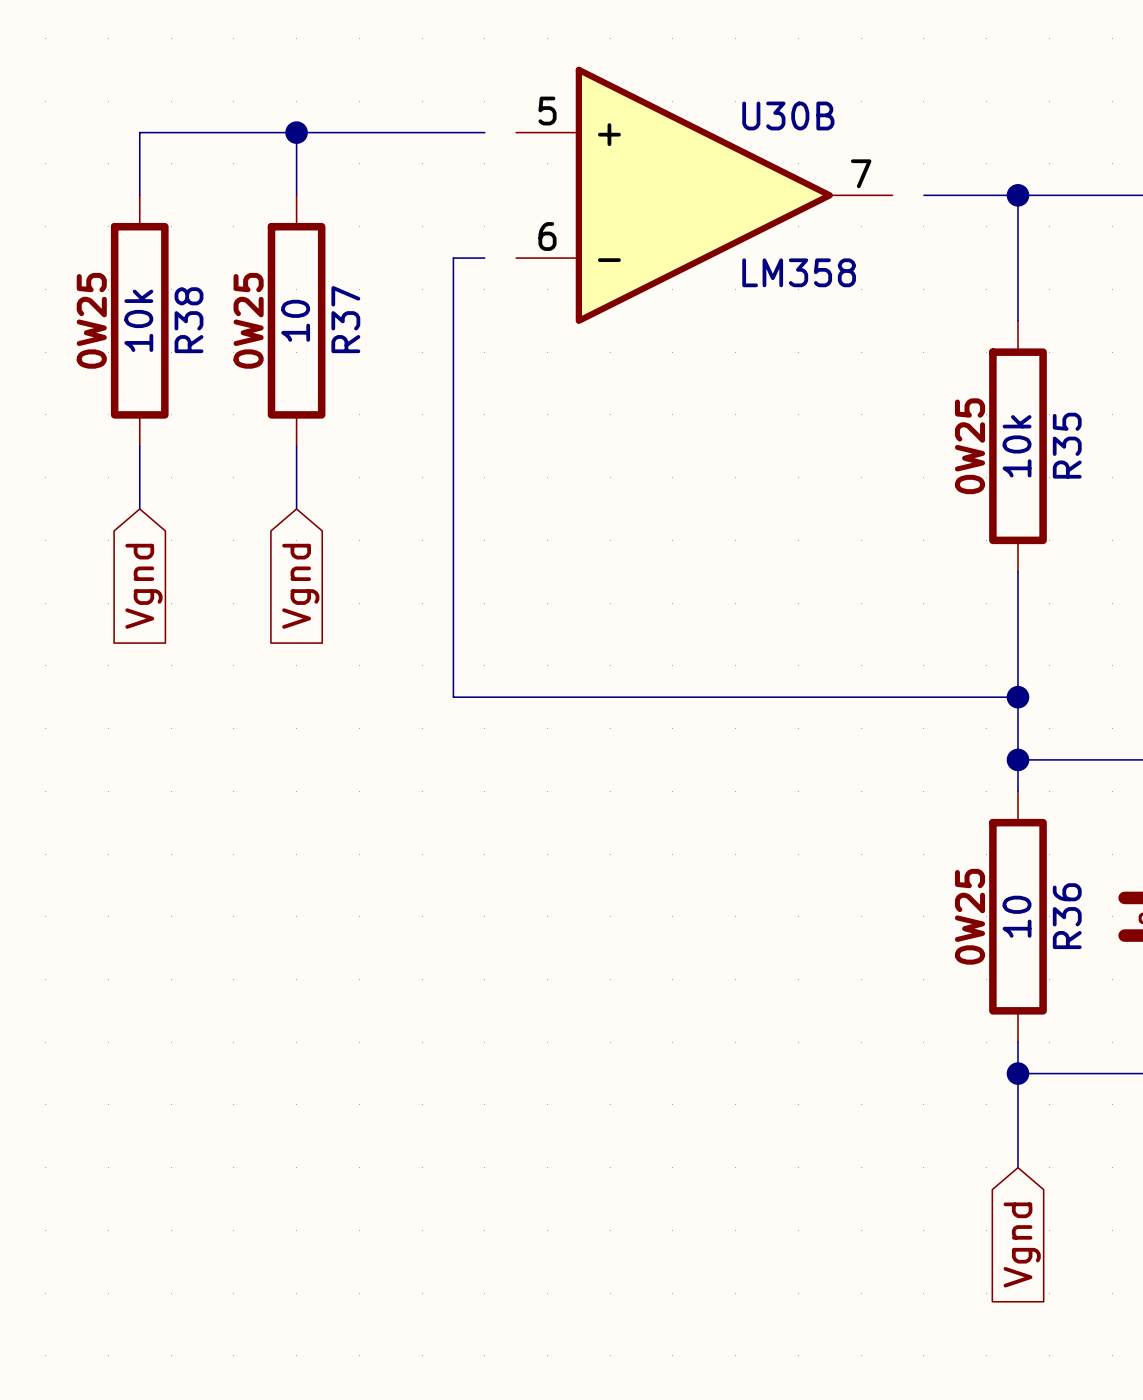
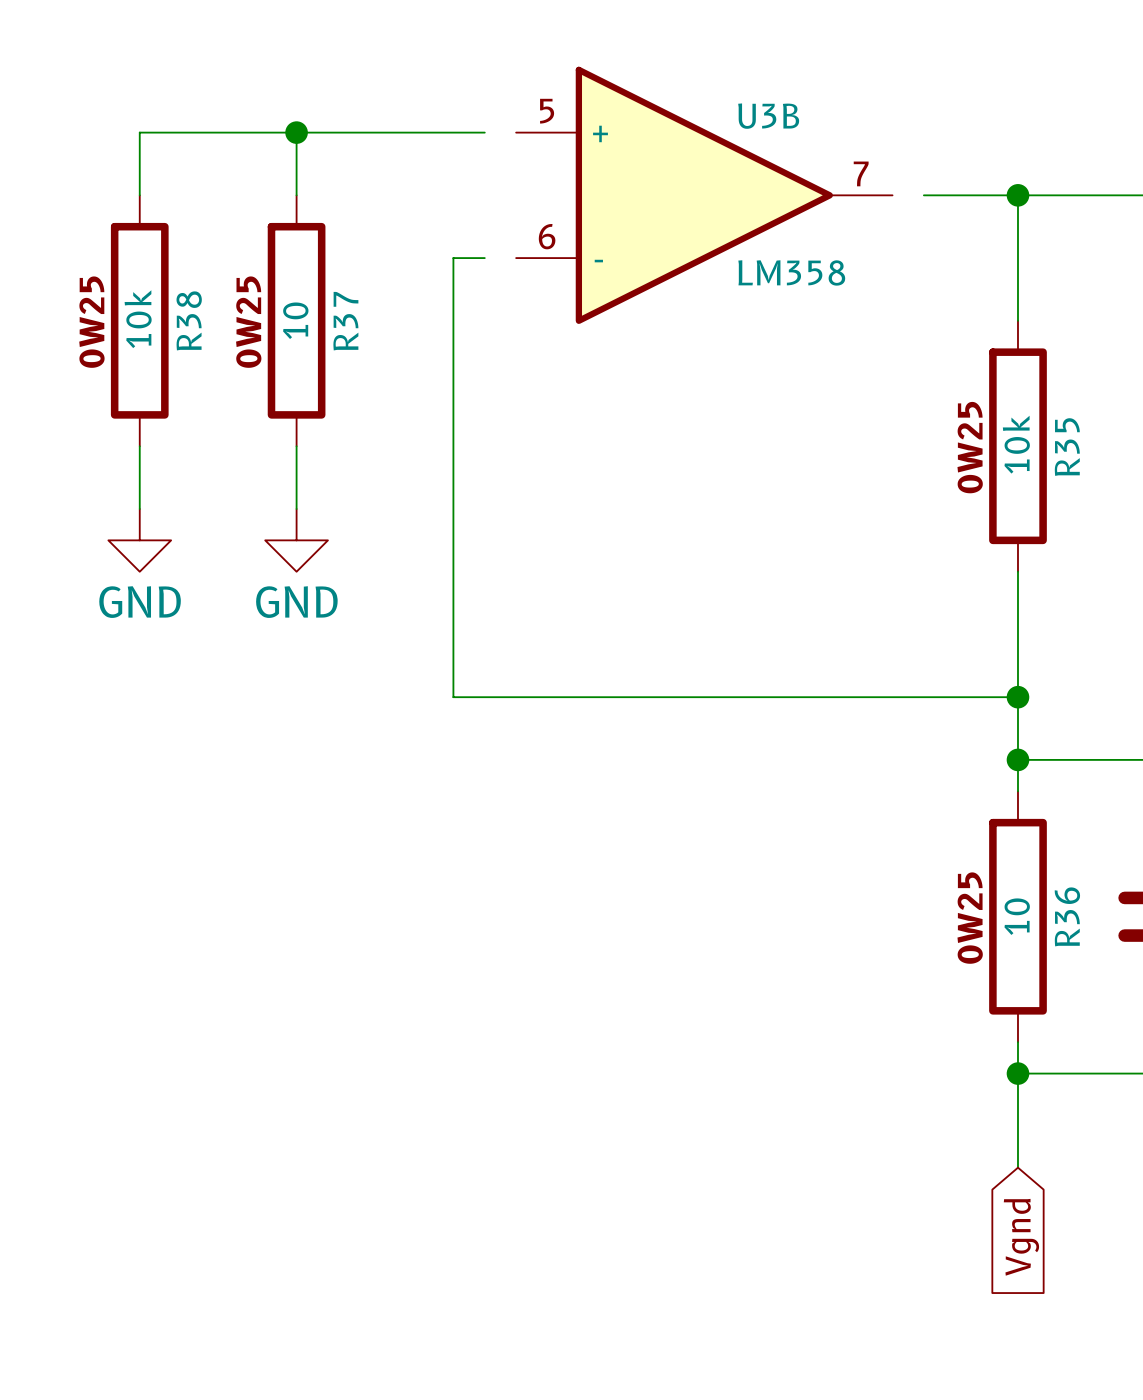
U30B name: U30B (788, 115) -> U3B (768, 116)
power symbol: none -> GND (139, 540)
power symbol: none -> GND (296, 540)
global label: Vgnd (143, 586) -> none
global label: Vgnd (300, 586) -> none

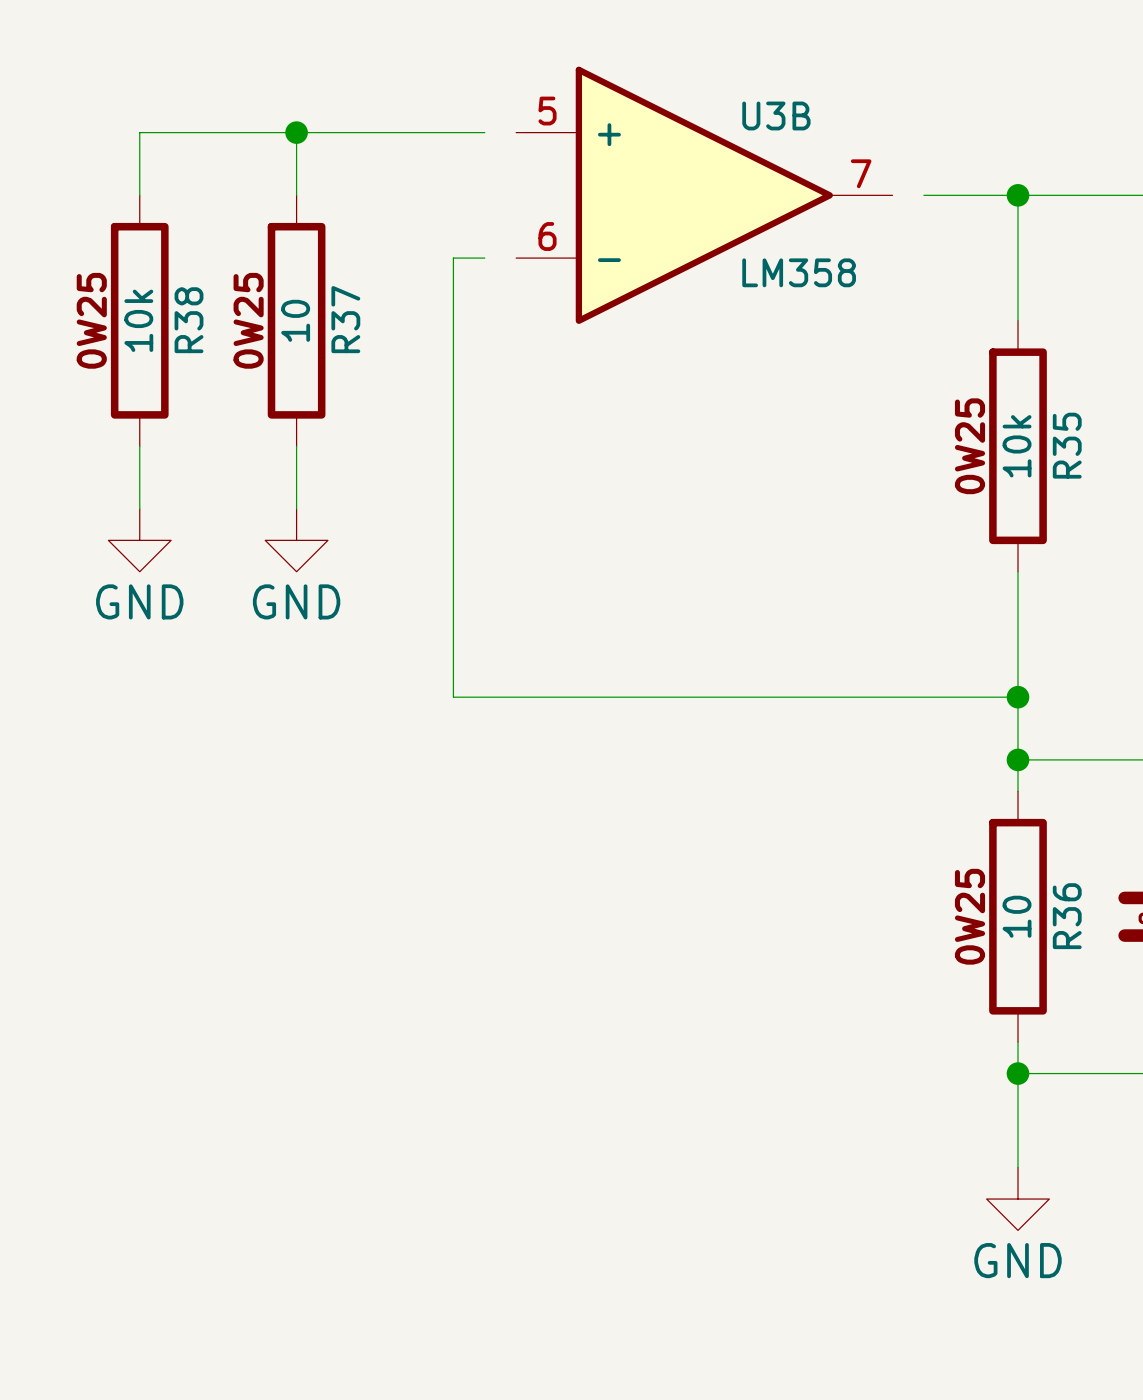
power symbol: none -> GND (1017, 1199)
global label: Vgnd (1021, 1237) -> none

